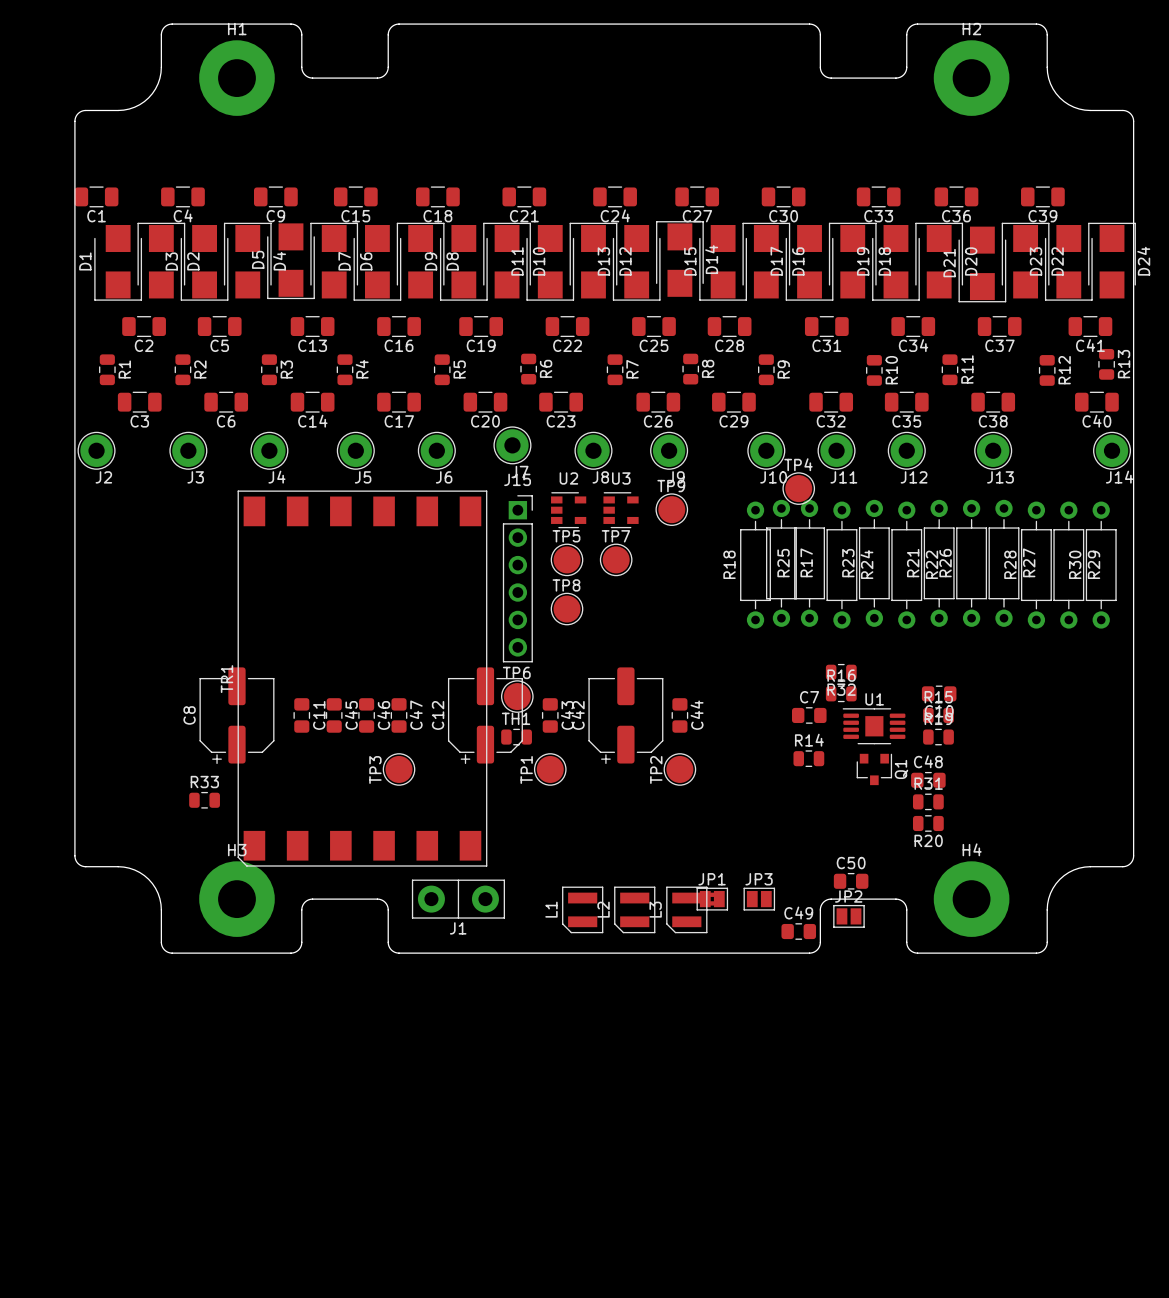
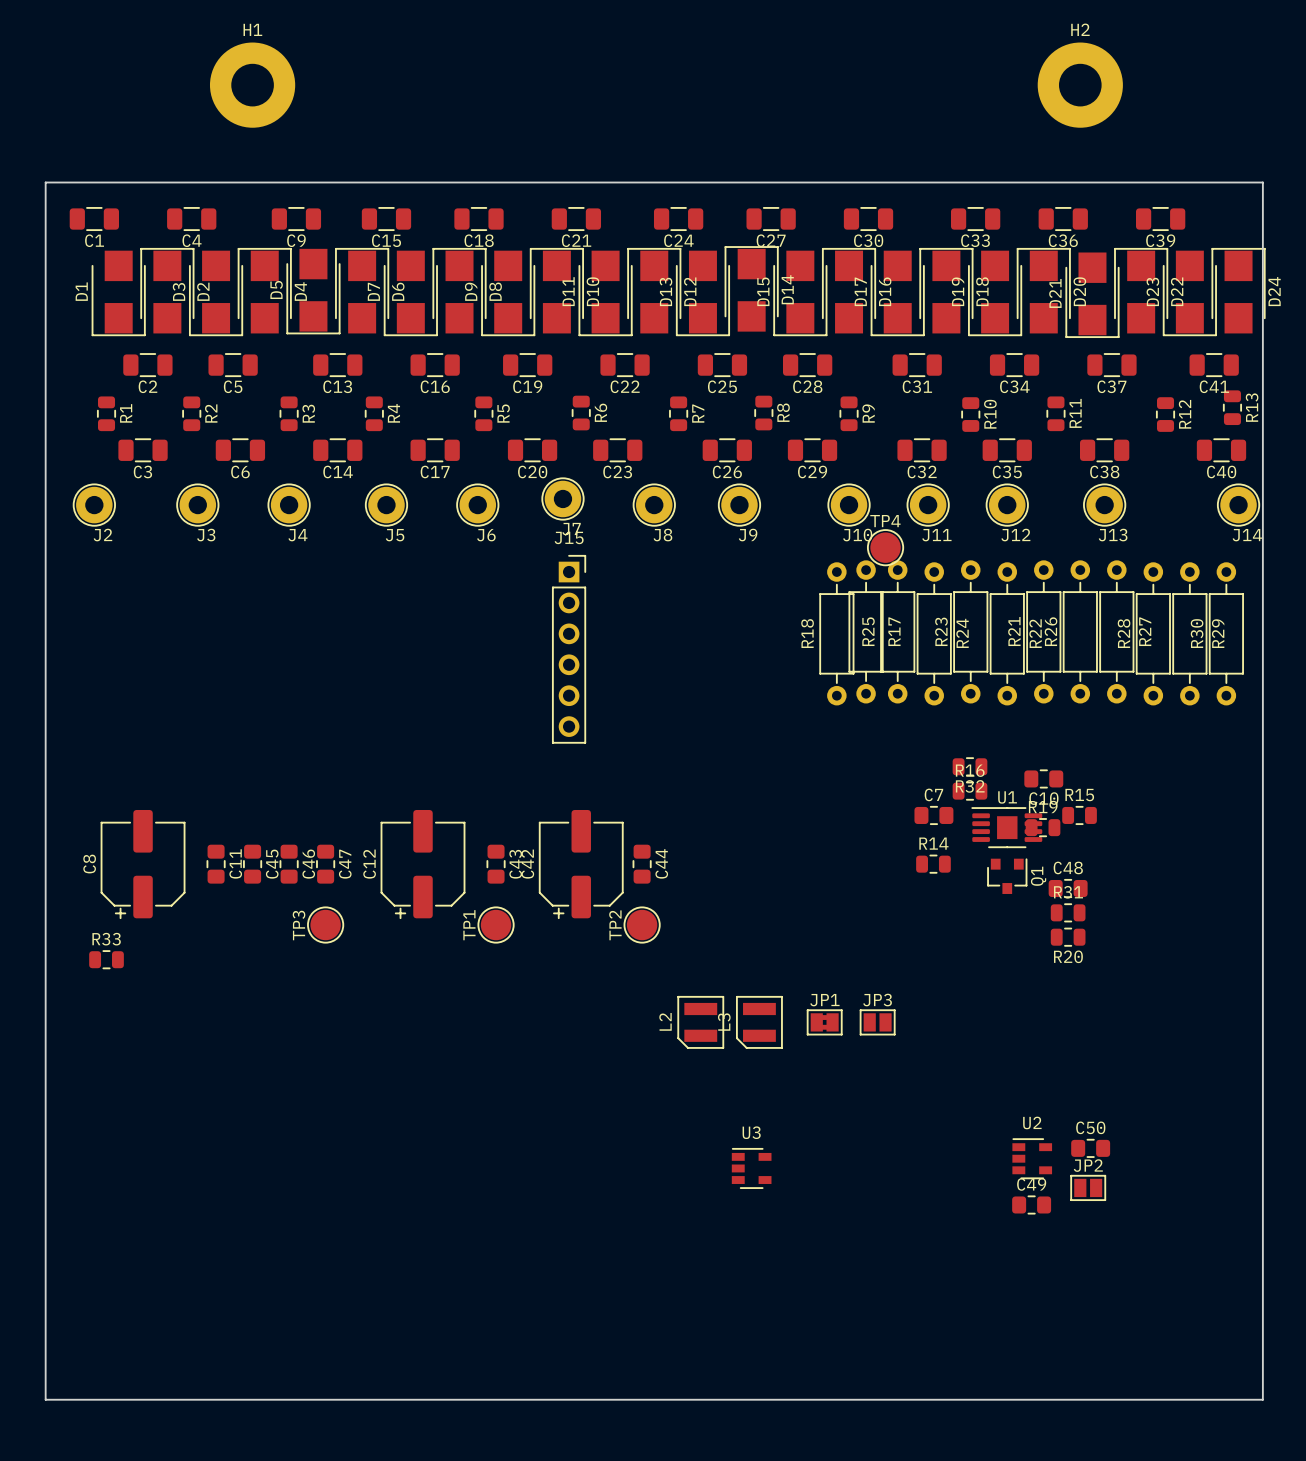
board edge: (1133, 164) (1133, 121) (1131, 114) (1124, 110) (1079, 109) (1059, 97) (1053, 88) (1047, 72) (1046, 32) (1042, 26) (1036, 24) (913, 24) (906, 33) (906, 70) (902, 75) (895, 78) (825, 76) (820, 68) (819, 32) (816, 26) (810, 24) (397, 24) (392, 26) (388, 32) (387, 71) (384, 75) (377, 78) (307, 76) (301, 68) (301, 32) (293, 24) (170, 24) (165, 26) (161, 32) (160, 72) (155, 88) (148, 97) (139, 104) (123, 110) (82, 110) (77, 114) (74, 121) (75, 857) (77, 862) (82, 866) (123, 867) (139, 872) (148, 879) (159, 898) (161, 943) (165, 950) (172, 953) (293, 952) (301, 945) (301, 908) (307, 900) (377, 899) (384, 901) (387, 905) (388, 945) (392, 950) (397, 953) (810, 953) (816, 950) (819, 945) (820, 908) (825, 900) (895, 899) (902, 901) (906, 907) (906, 943) (913, 952) (1037, 953) (1042, 950) (1046, 945) (1047, 904) (1053, 888) (1059, 879) (1068, 872) (1084, 867) (1125, 866) (1131, 862) (1133, 855) -> (1262, 182) (45, 182) (45, 1399) (1262, 1399) (1262, 961)
TP9: (671, 509) -> none
U2 position: (568, 510) -> (1032, 1158)
U3 position: (621, 510) -> (751, 1168)
TP5: (567, 559) -> none
TP7: (616, 559) -> none
TP8: (567, 609) -> none
C12 footprint: [447, 667, 523, 765] -> [380, 809, 466, 919]
C42 footprint: [588, 667, 664, 765] -> [539, 809, 624, 919]
R32 position: (841, 672) -> (969, 766)
TR1: (362, 678) -> none
R16 position: (841, 693) -> (969, 791)
TP6: (517, 696) -> none
C8 position: (236, 715) -> (143, 864)
C11 position: (301, 715) -> (216, 864)
C45 position: (334, 715) -> (252, 864)
C46 position: (366, 715) -> (289, 864)
C47 position: (399, 715) -> (325, 864)
C43 position: (550, 715) -> (496, 864)
C44 position: (679, 715) -> (642, 864)
C7 position: (809, 715) -> (933, 815)
R15 position: (938, 715) -> (1079, 815)
U1 position: (874, 726) -> (1006, 827)
TH1: (516, 737) -> none
R14 position: (808, 758) -> (933, 864)
TP3 position: (399, 769) -> (325, 925)
TP1 position: (550, 769) -> (496, 925)
TP2 position: (679, 769) -> (642, 925)
Q1 position: (874, 769) -> (1007, 876)
C48 position: (928, 780) -> (1068, 888)
R33 position: (204, 800) -> (106, 959)
R31 position: (928, 801) -> (1068, 912)
R20 position: (928, 823) -> (1068, 937)
C50 position: (851, 881) -> (1090, 1148)
H3: (236, 899) -> none
J1: (458, 899) -> none
JP1 position: (712, 899) -> (824, 1022)
JP3 position: (759, 899) -> (877, 1022)
H4: (971, 899) -> none
L1: (582, 909) -> none
JP2 position: (848, 916) -> (1088, 1187)
C49 position: (798, 931) -> (1031, 1204)

